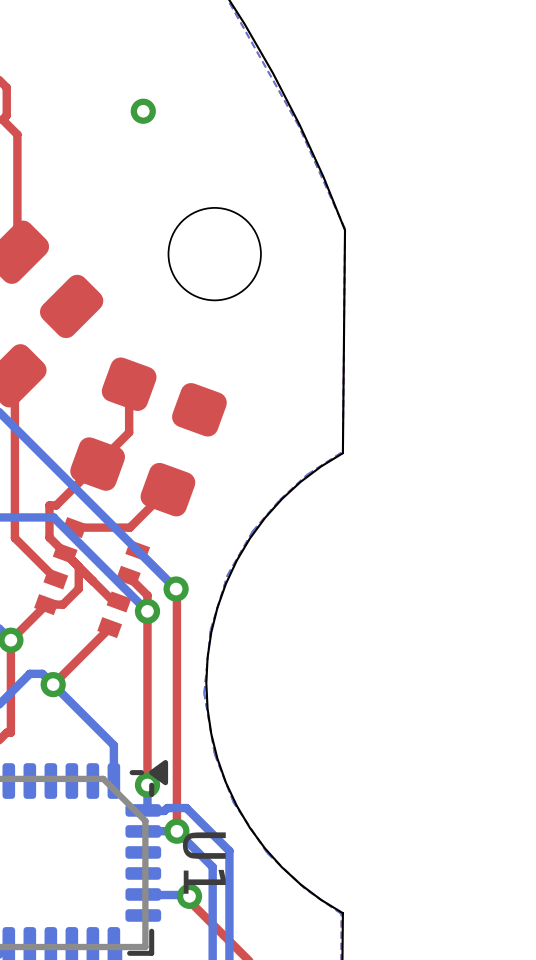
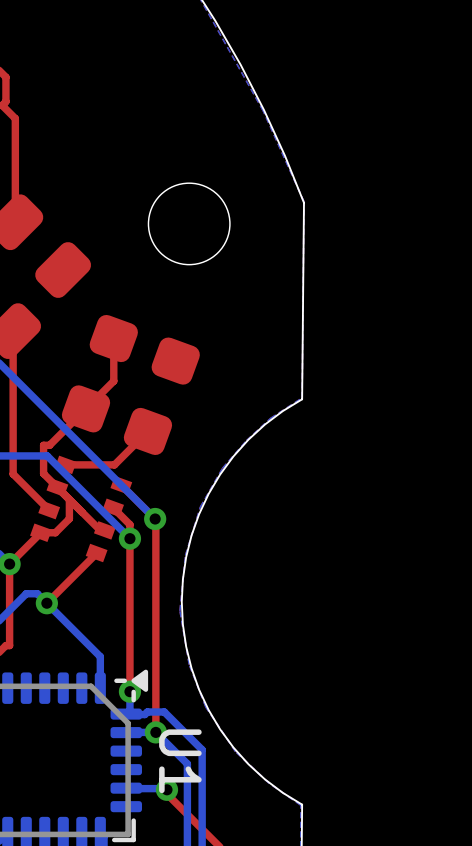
via: (143, 111) -> none

